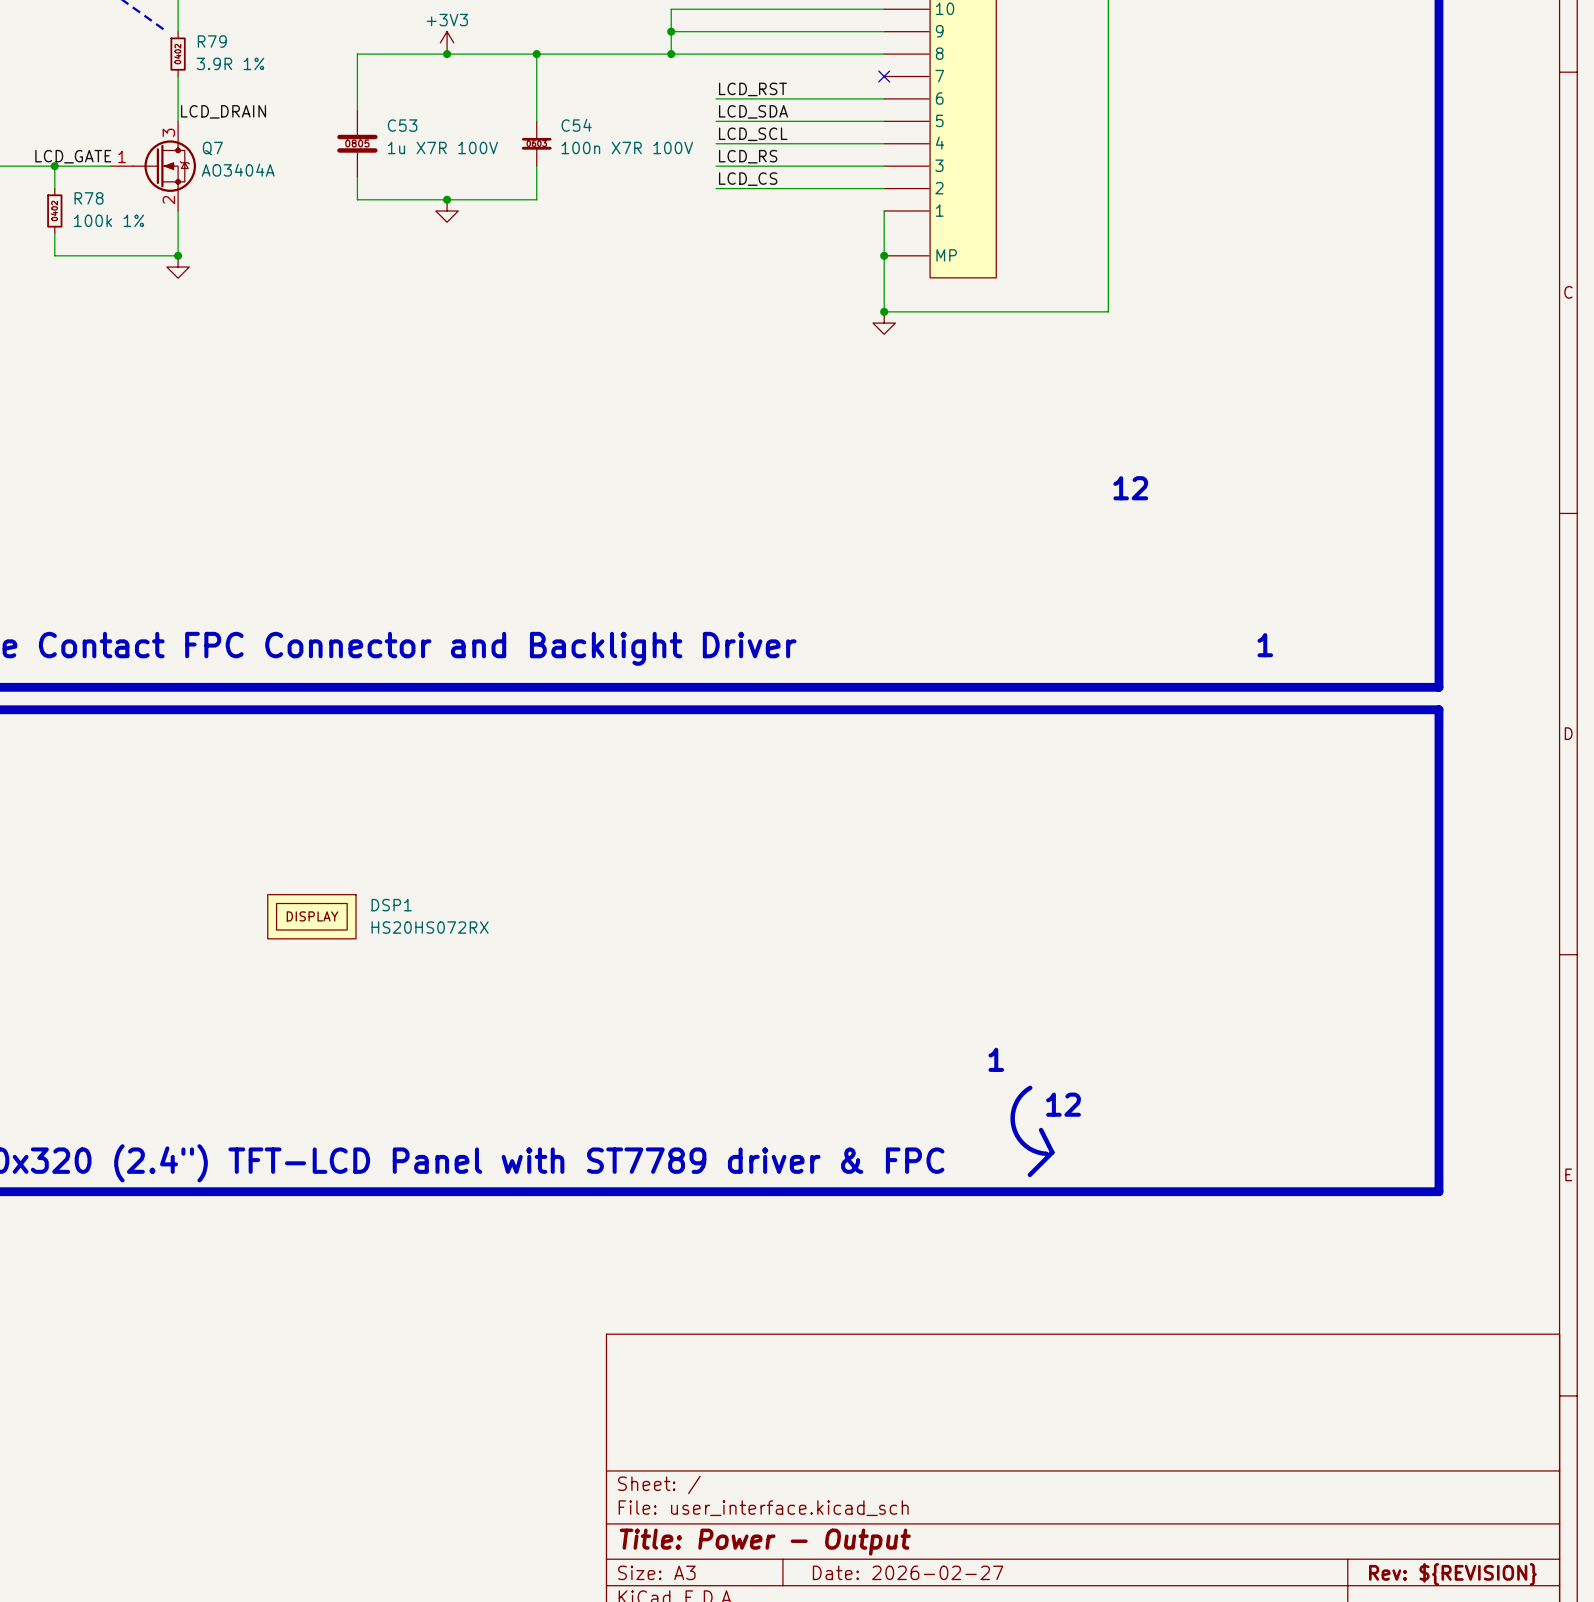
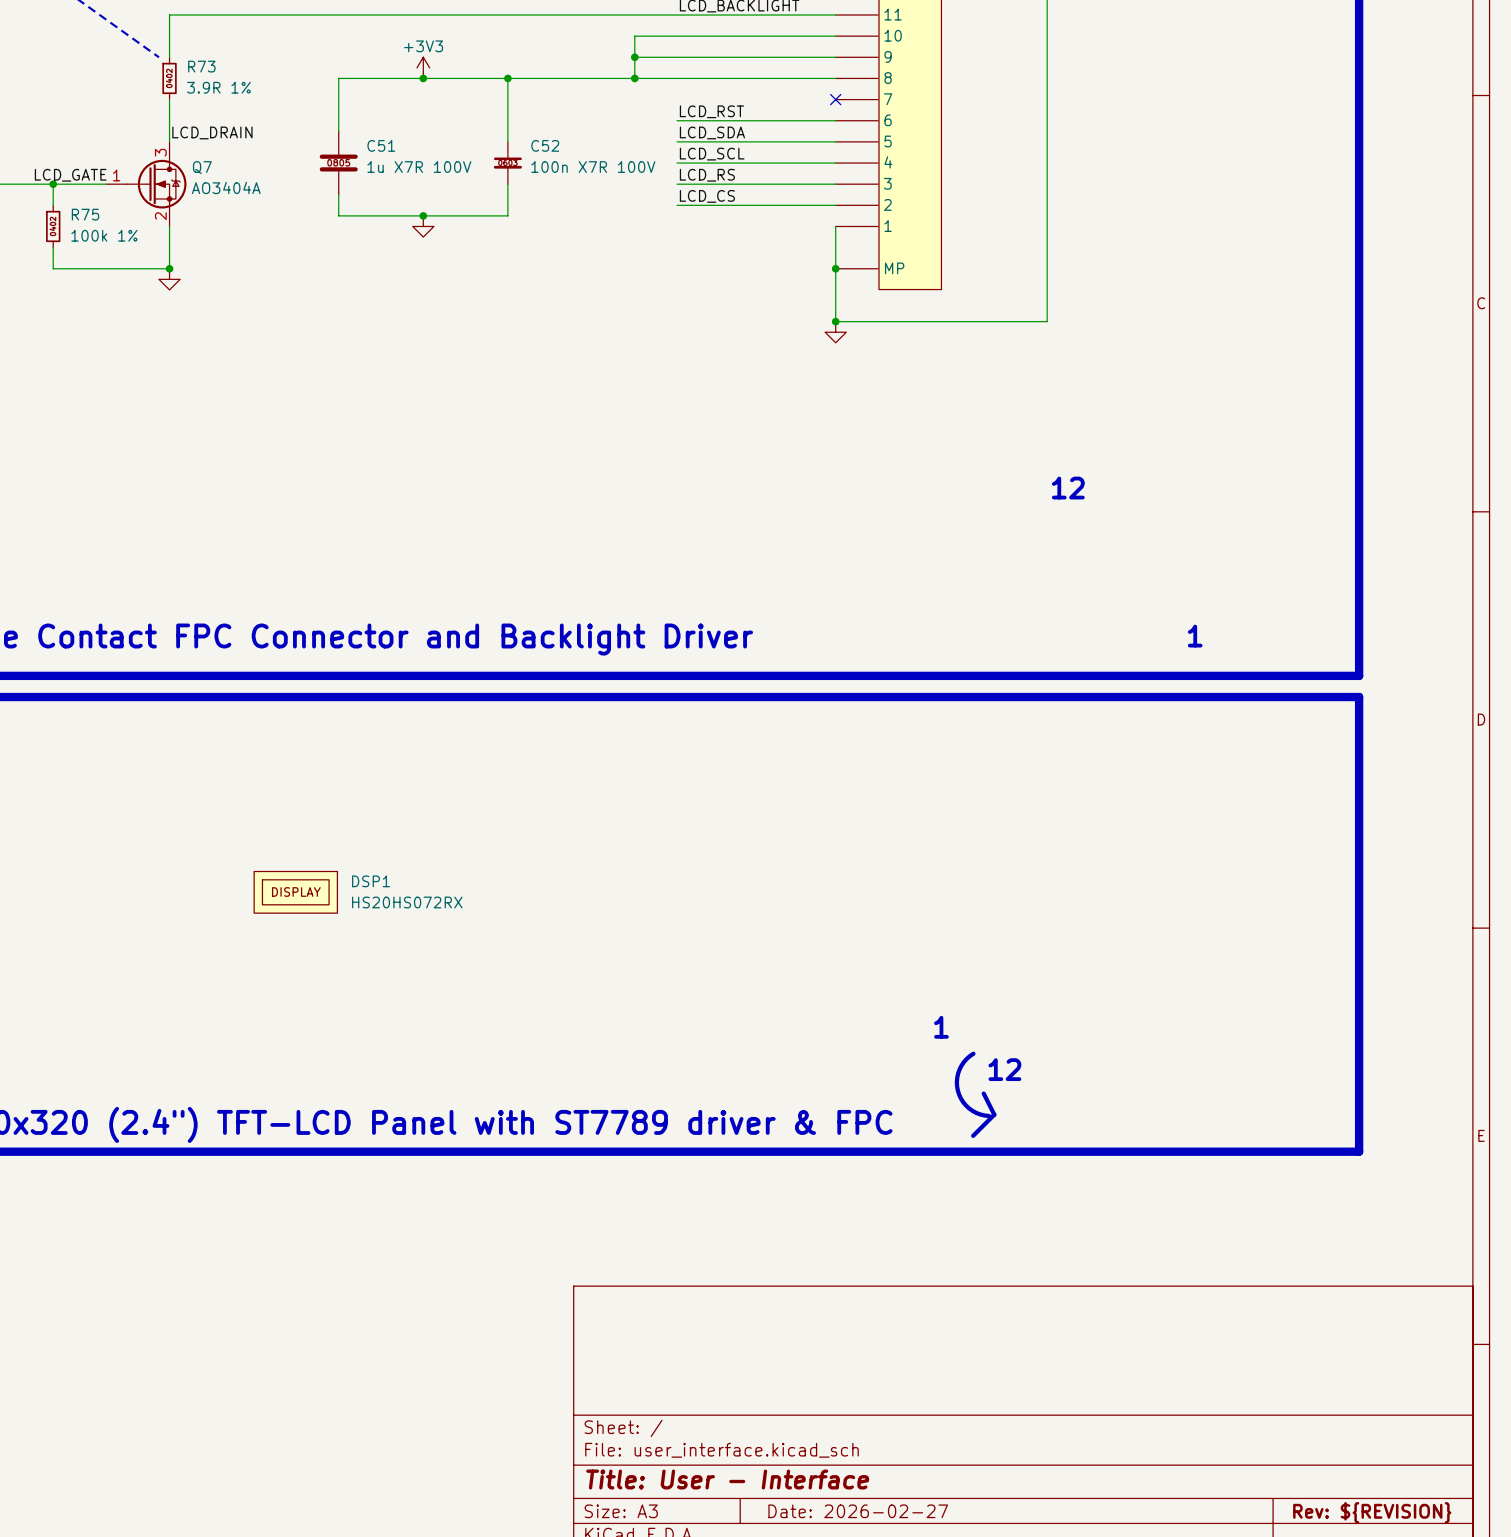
R79 name: R79 (212, 41) -> R73 (201, 66)
C53 name: C53 (402, 125) -> C51 (381, 145)
C54 name: C54 (576, 125) -> C52 (545, 145)
R78 name: R78 (89, 198) -> R75 (85, 214)
title block: Title: Power - Output (765, 1542) -> Title: User - Interface (727, 1479)

